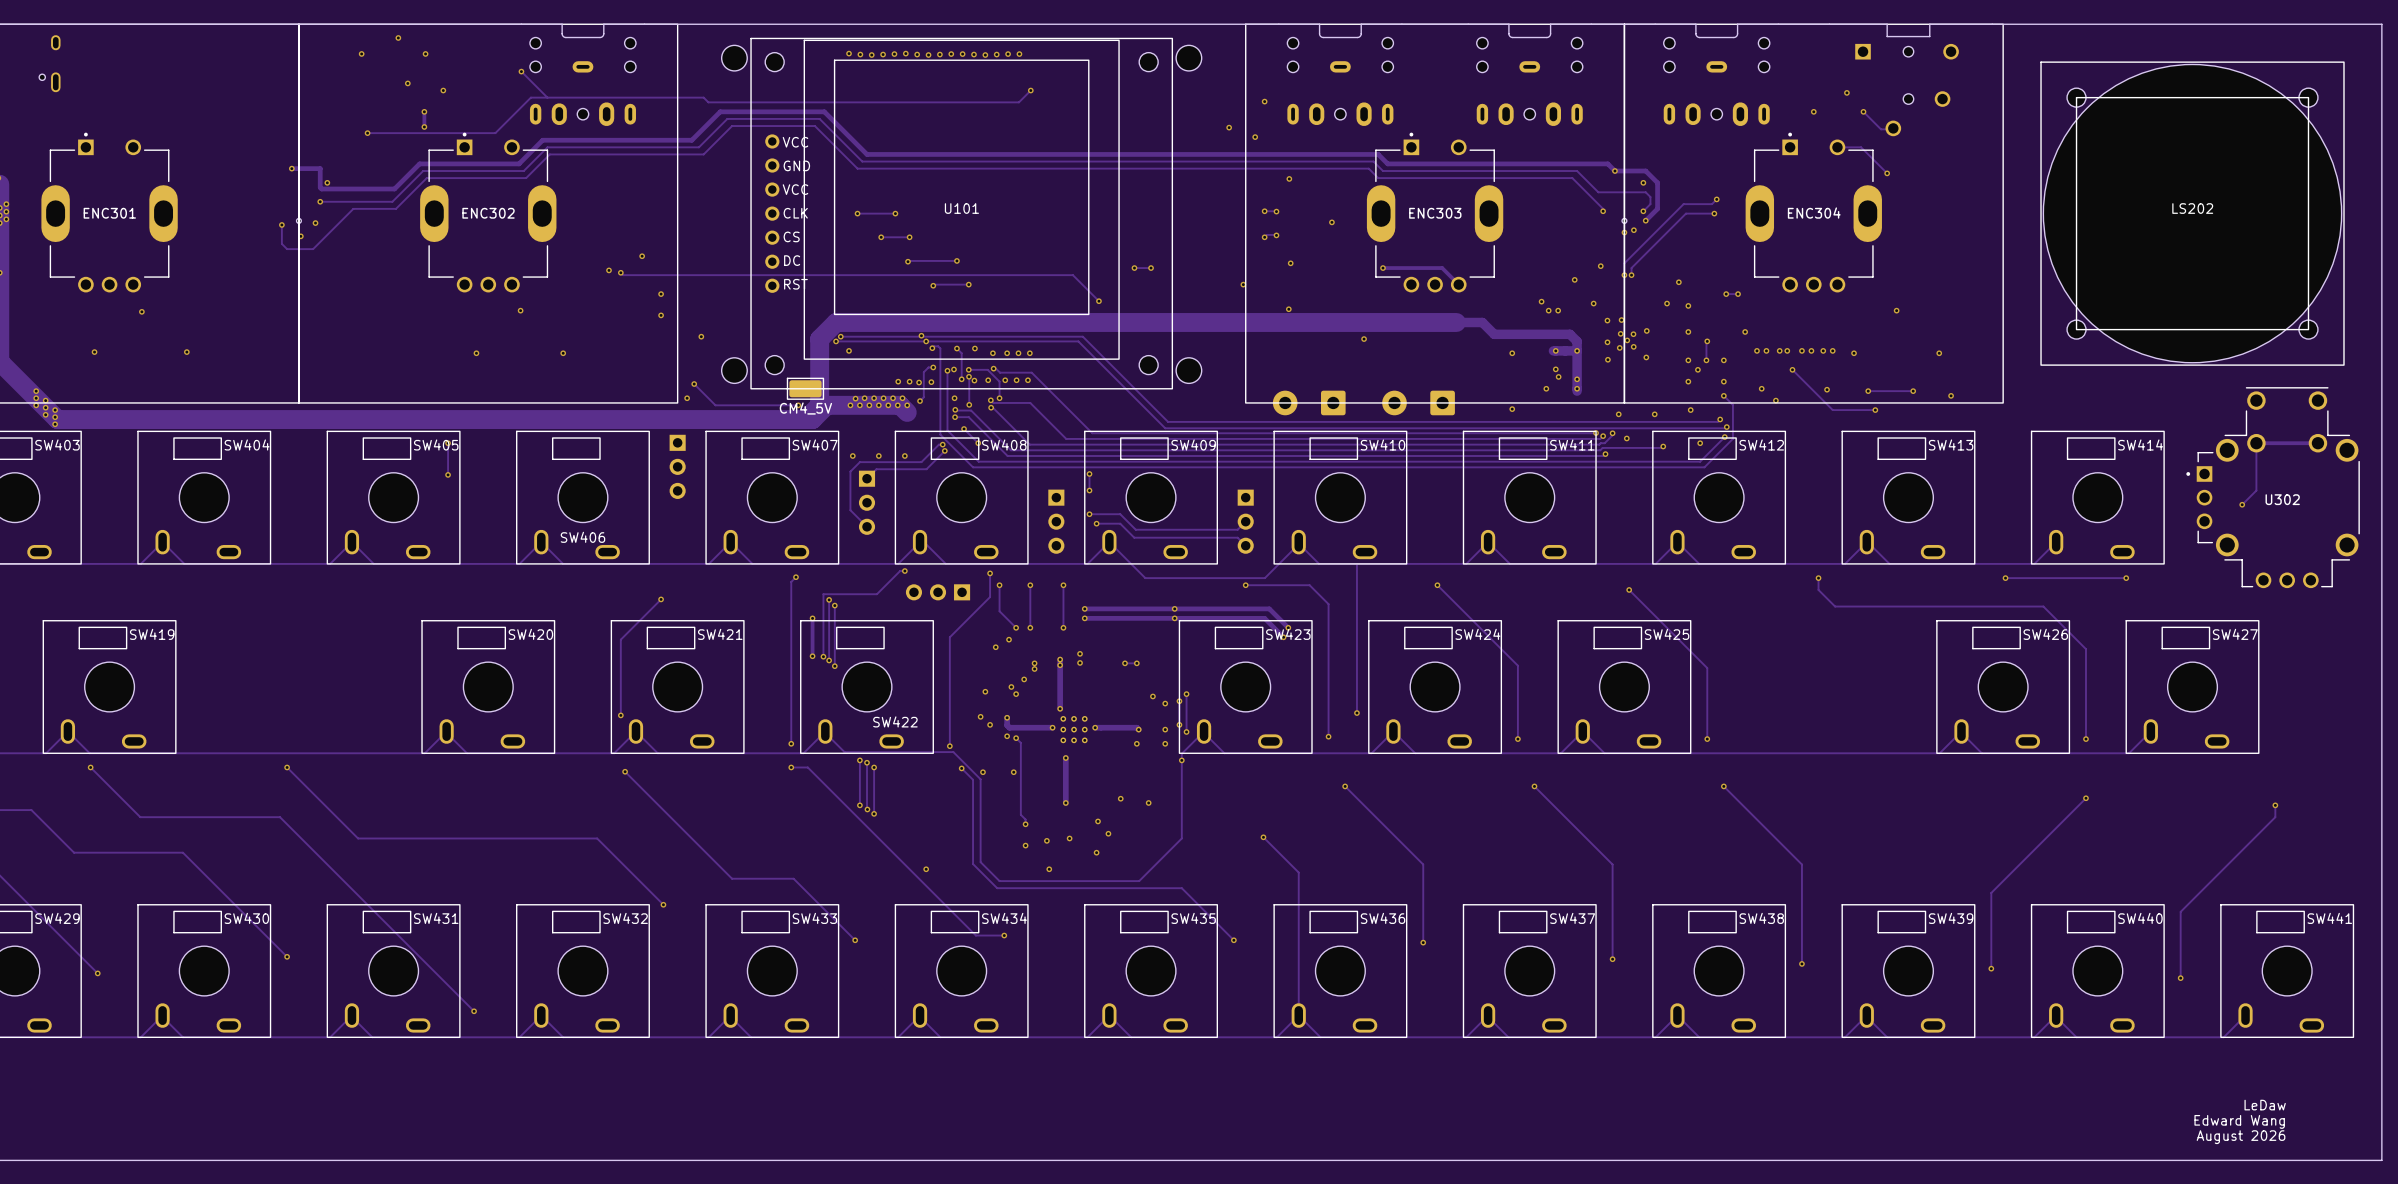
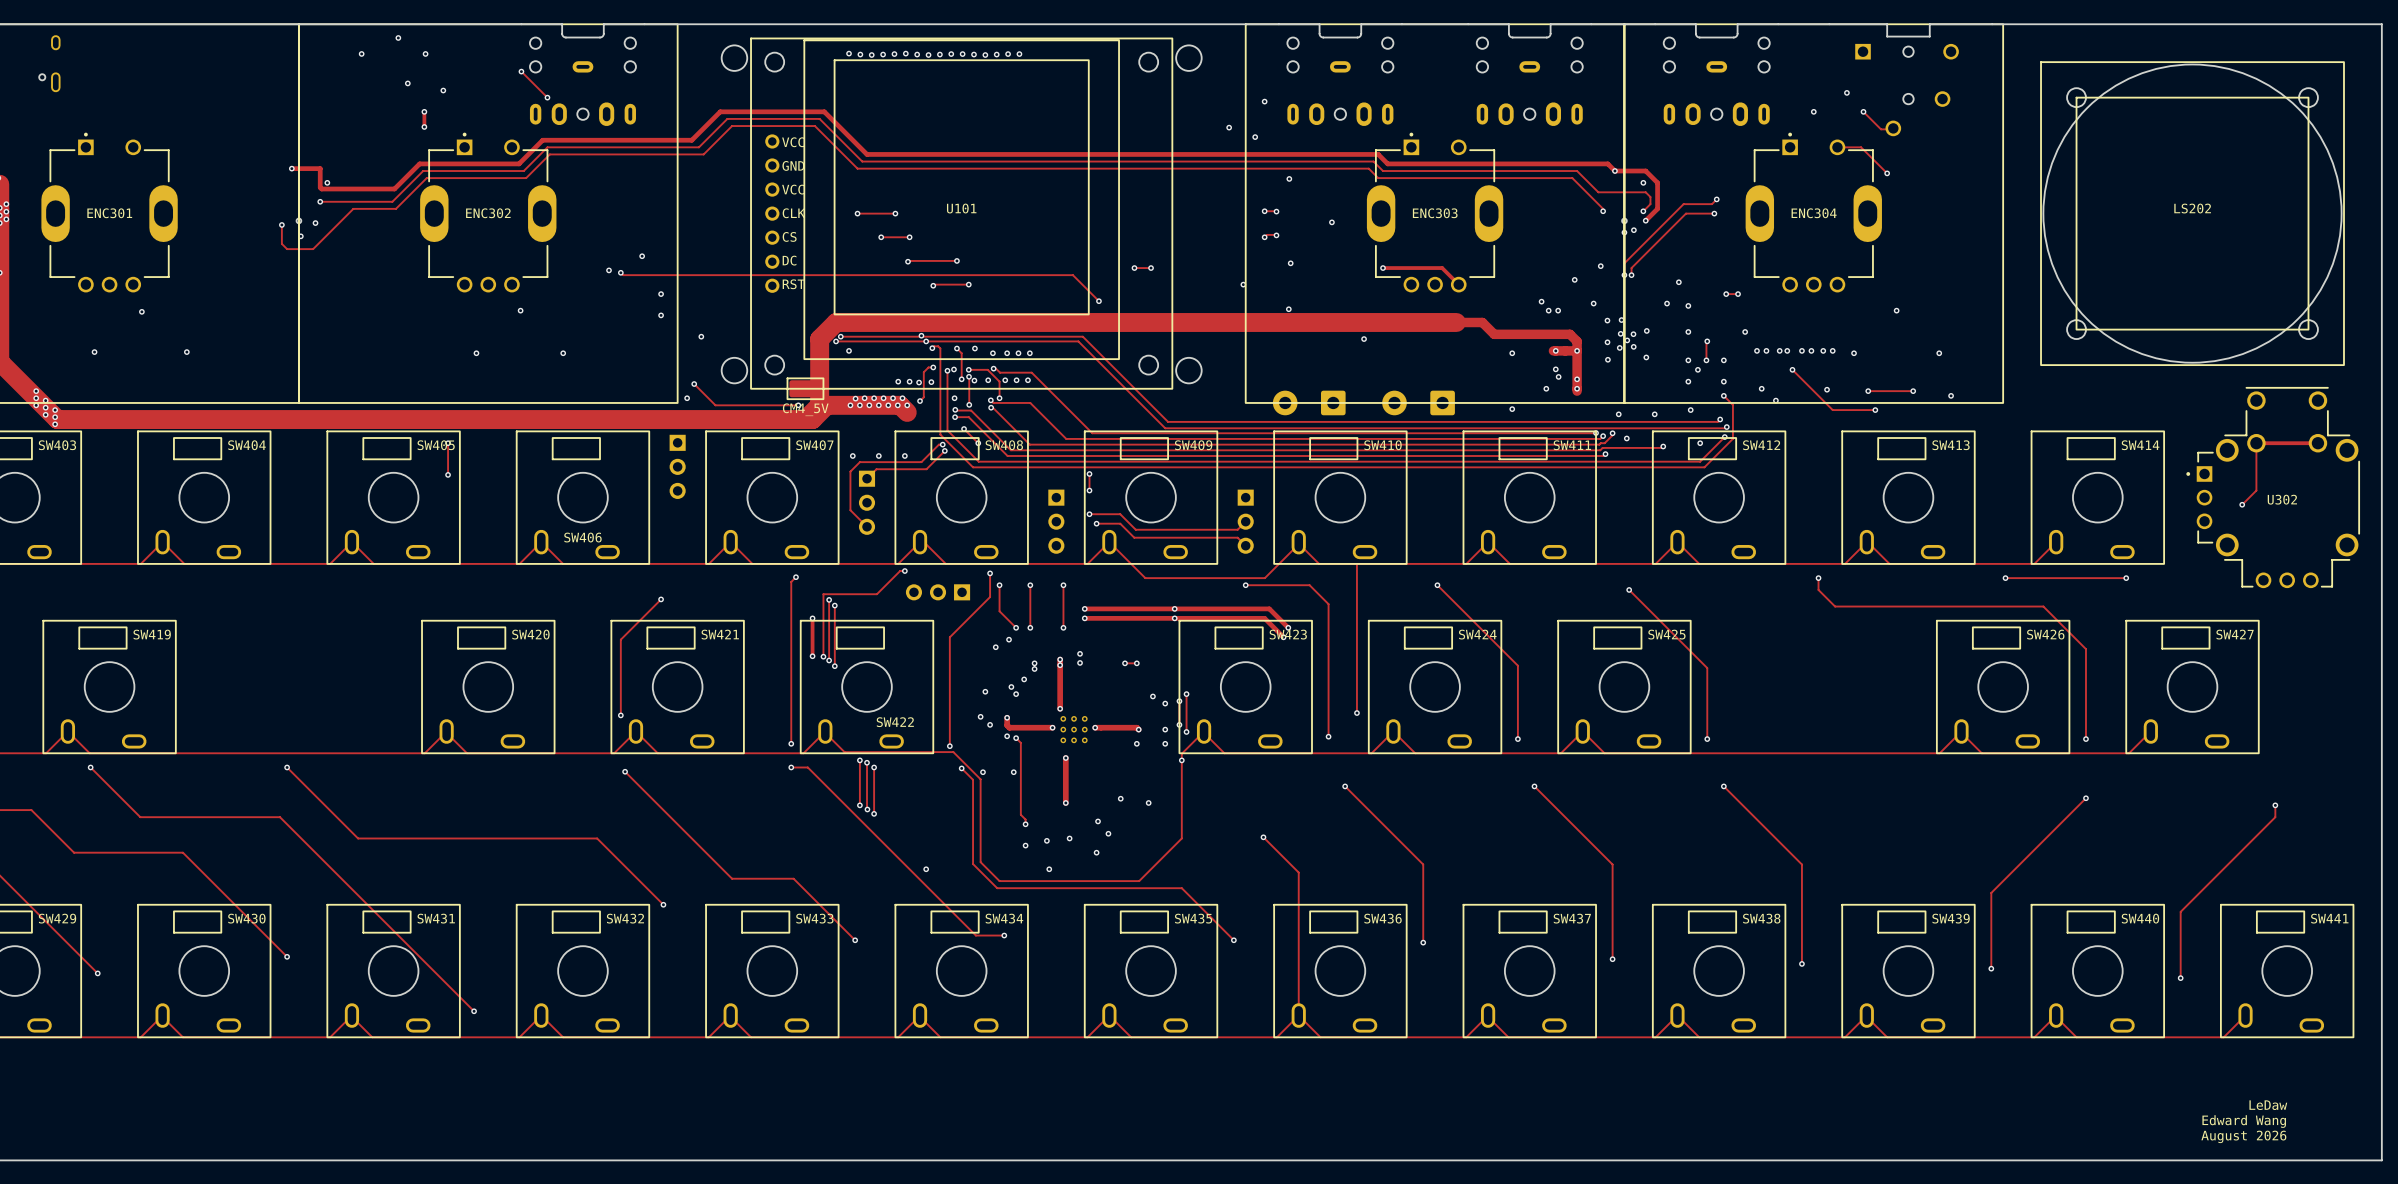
track: (1030, 90) (1018, 102) (708, 102) (703, 97) (530, 97) (495, 133) (367, 133) -> none
via: (1030, 90) -> none
via: none -> (547, 97)
via: (367, 133) -> none

